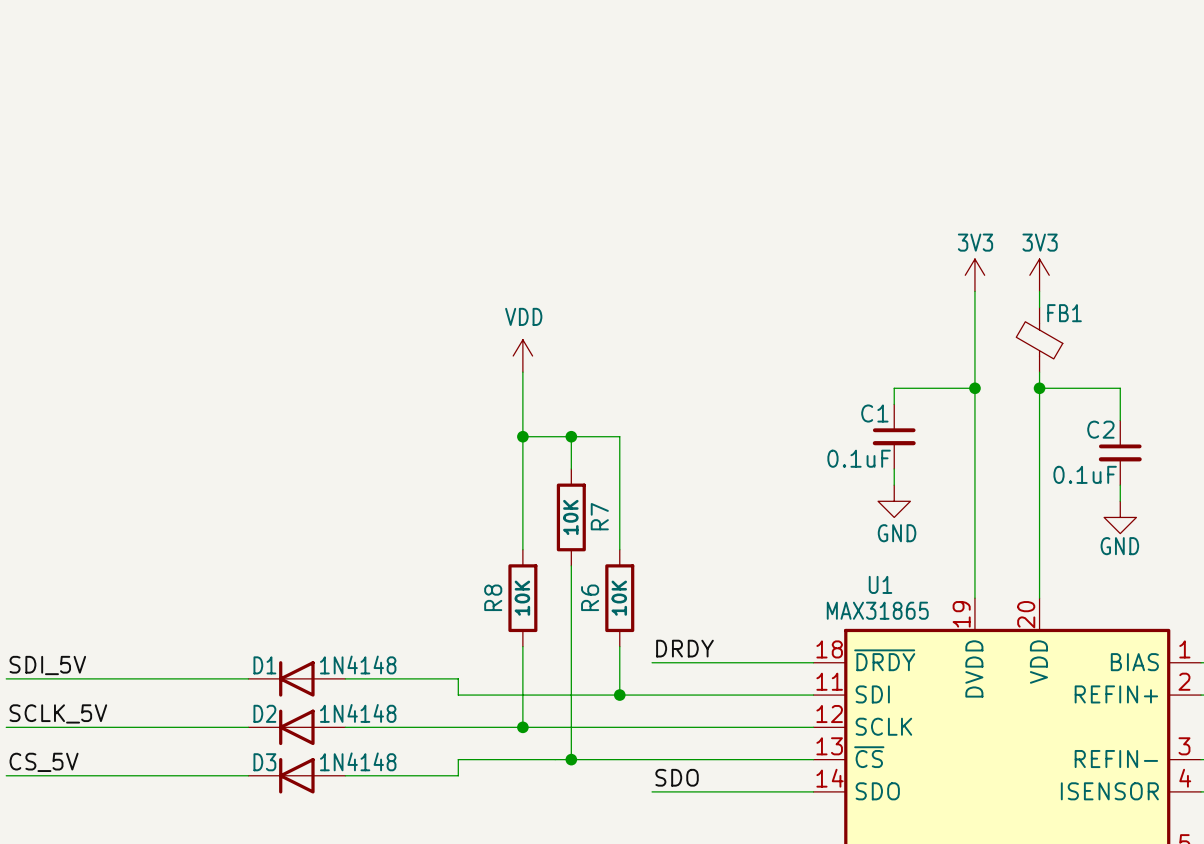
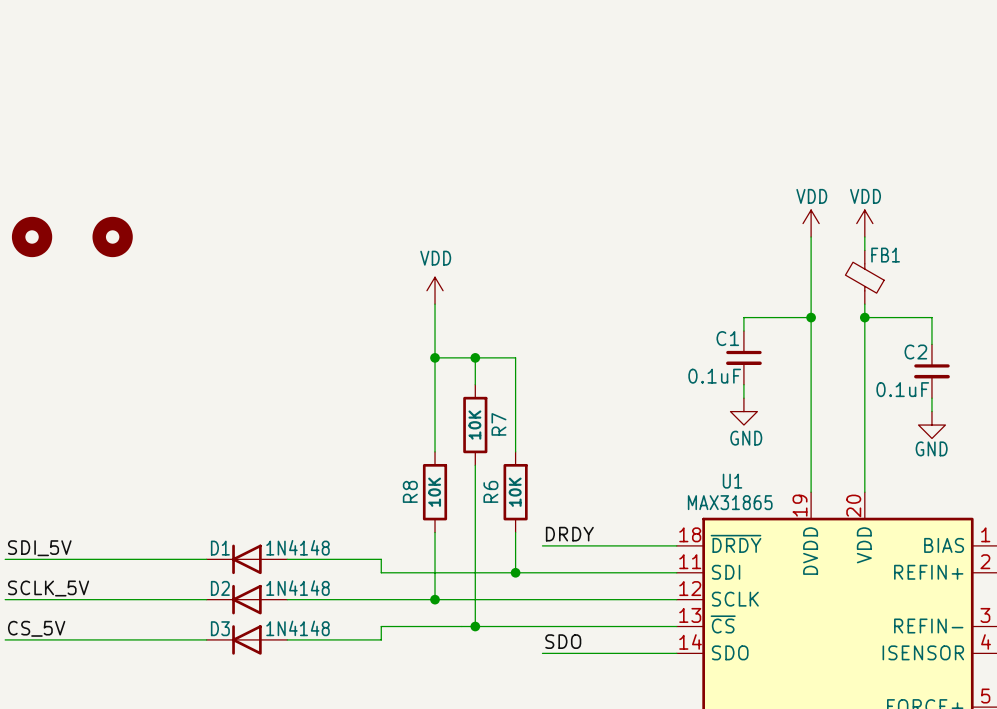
power symbol: 3V3 (974, 275) -> VDD (811, 223)
power symbol: 3V3 (1039, 275) -> VDD (864, 223)
part: none -> (32, 236)
part: none -> (112, 236)

